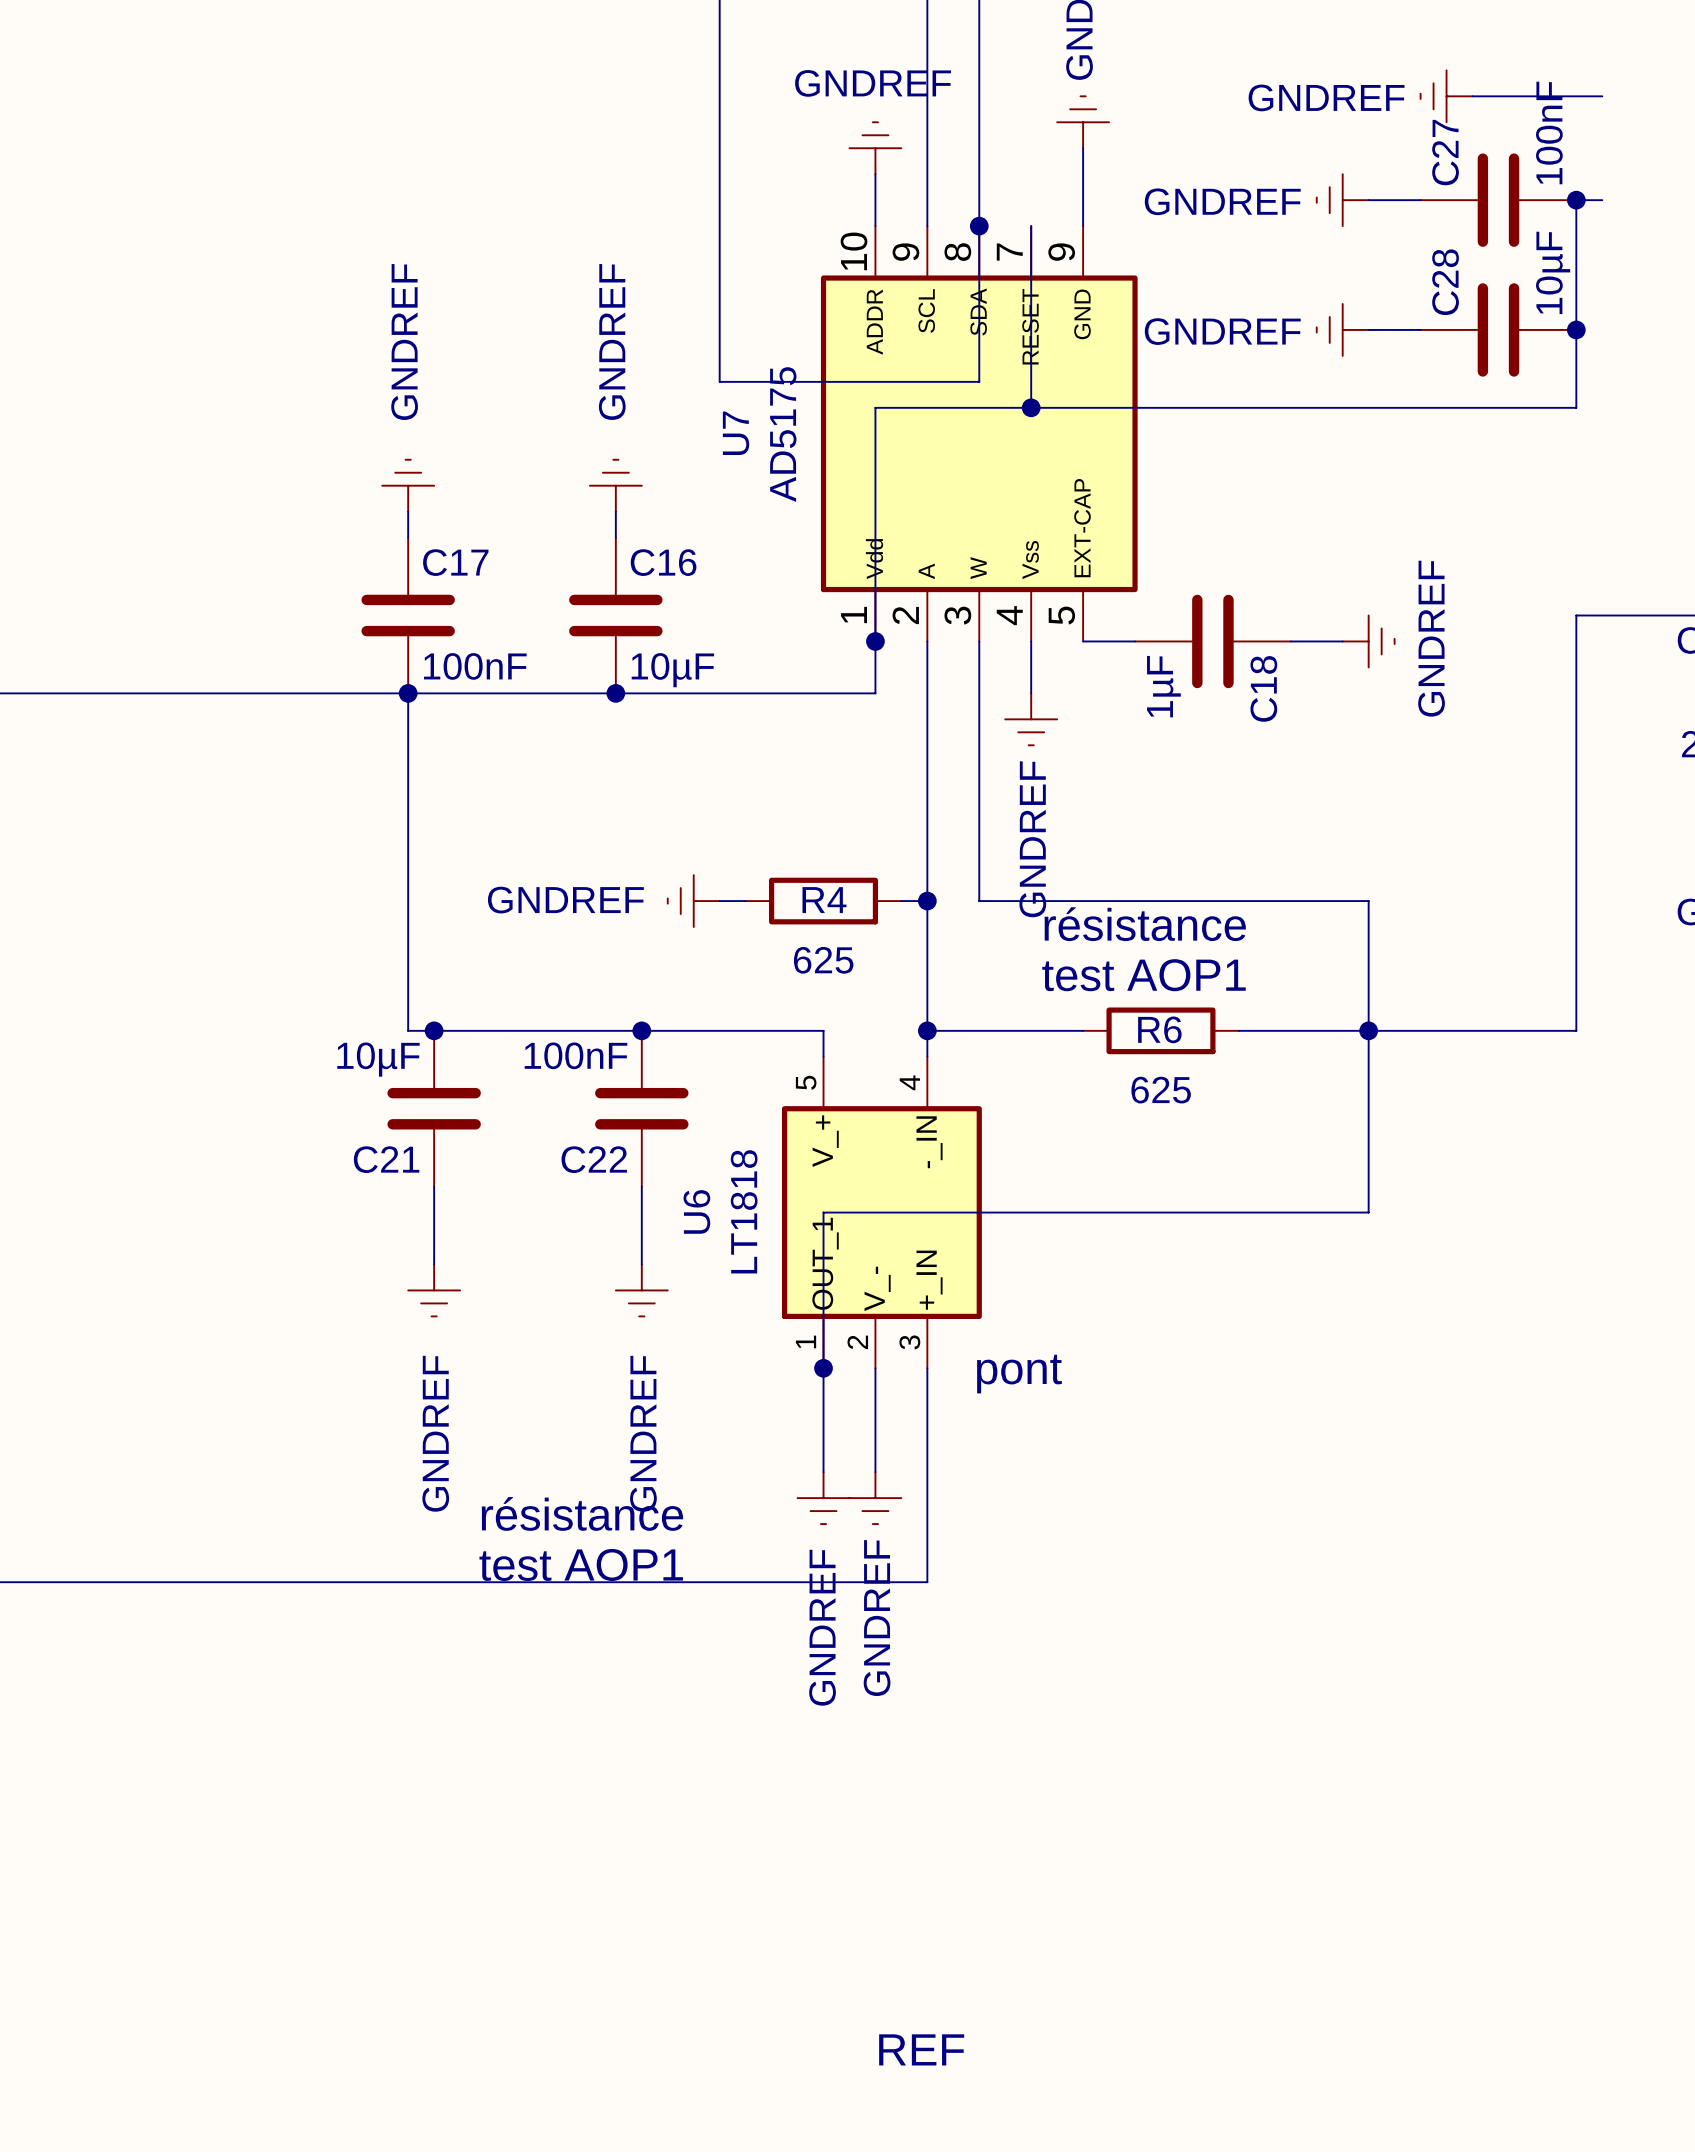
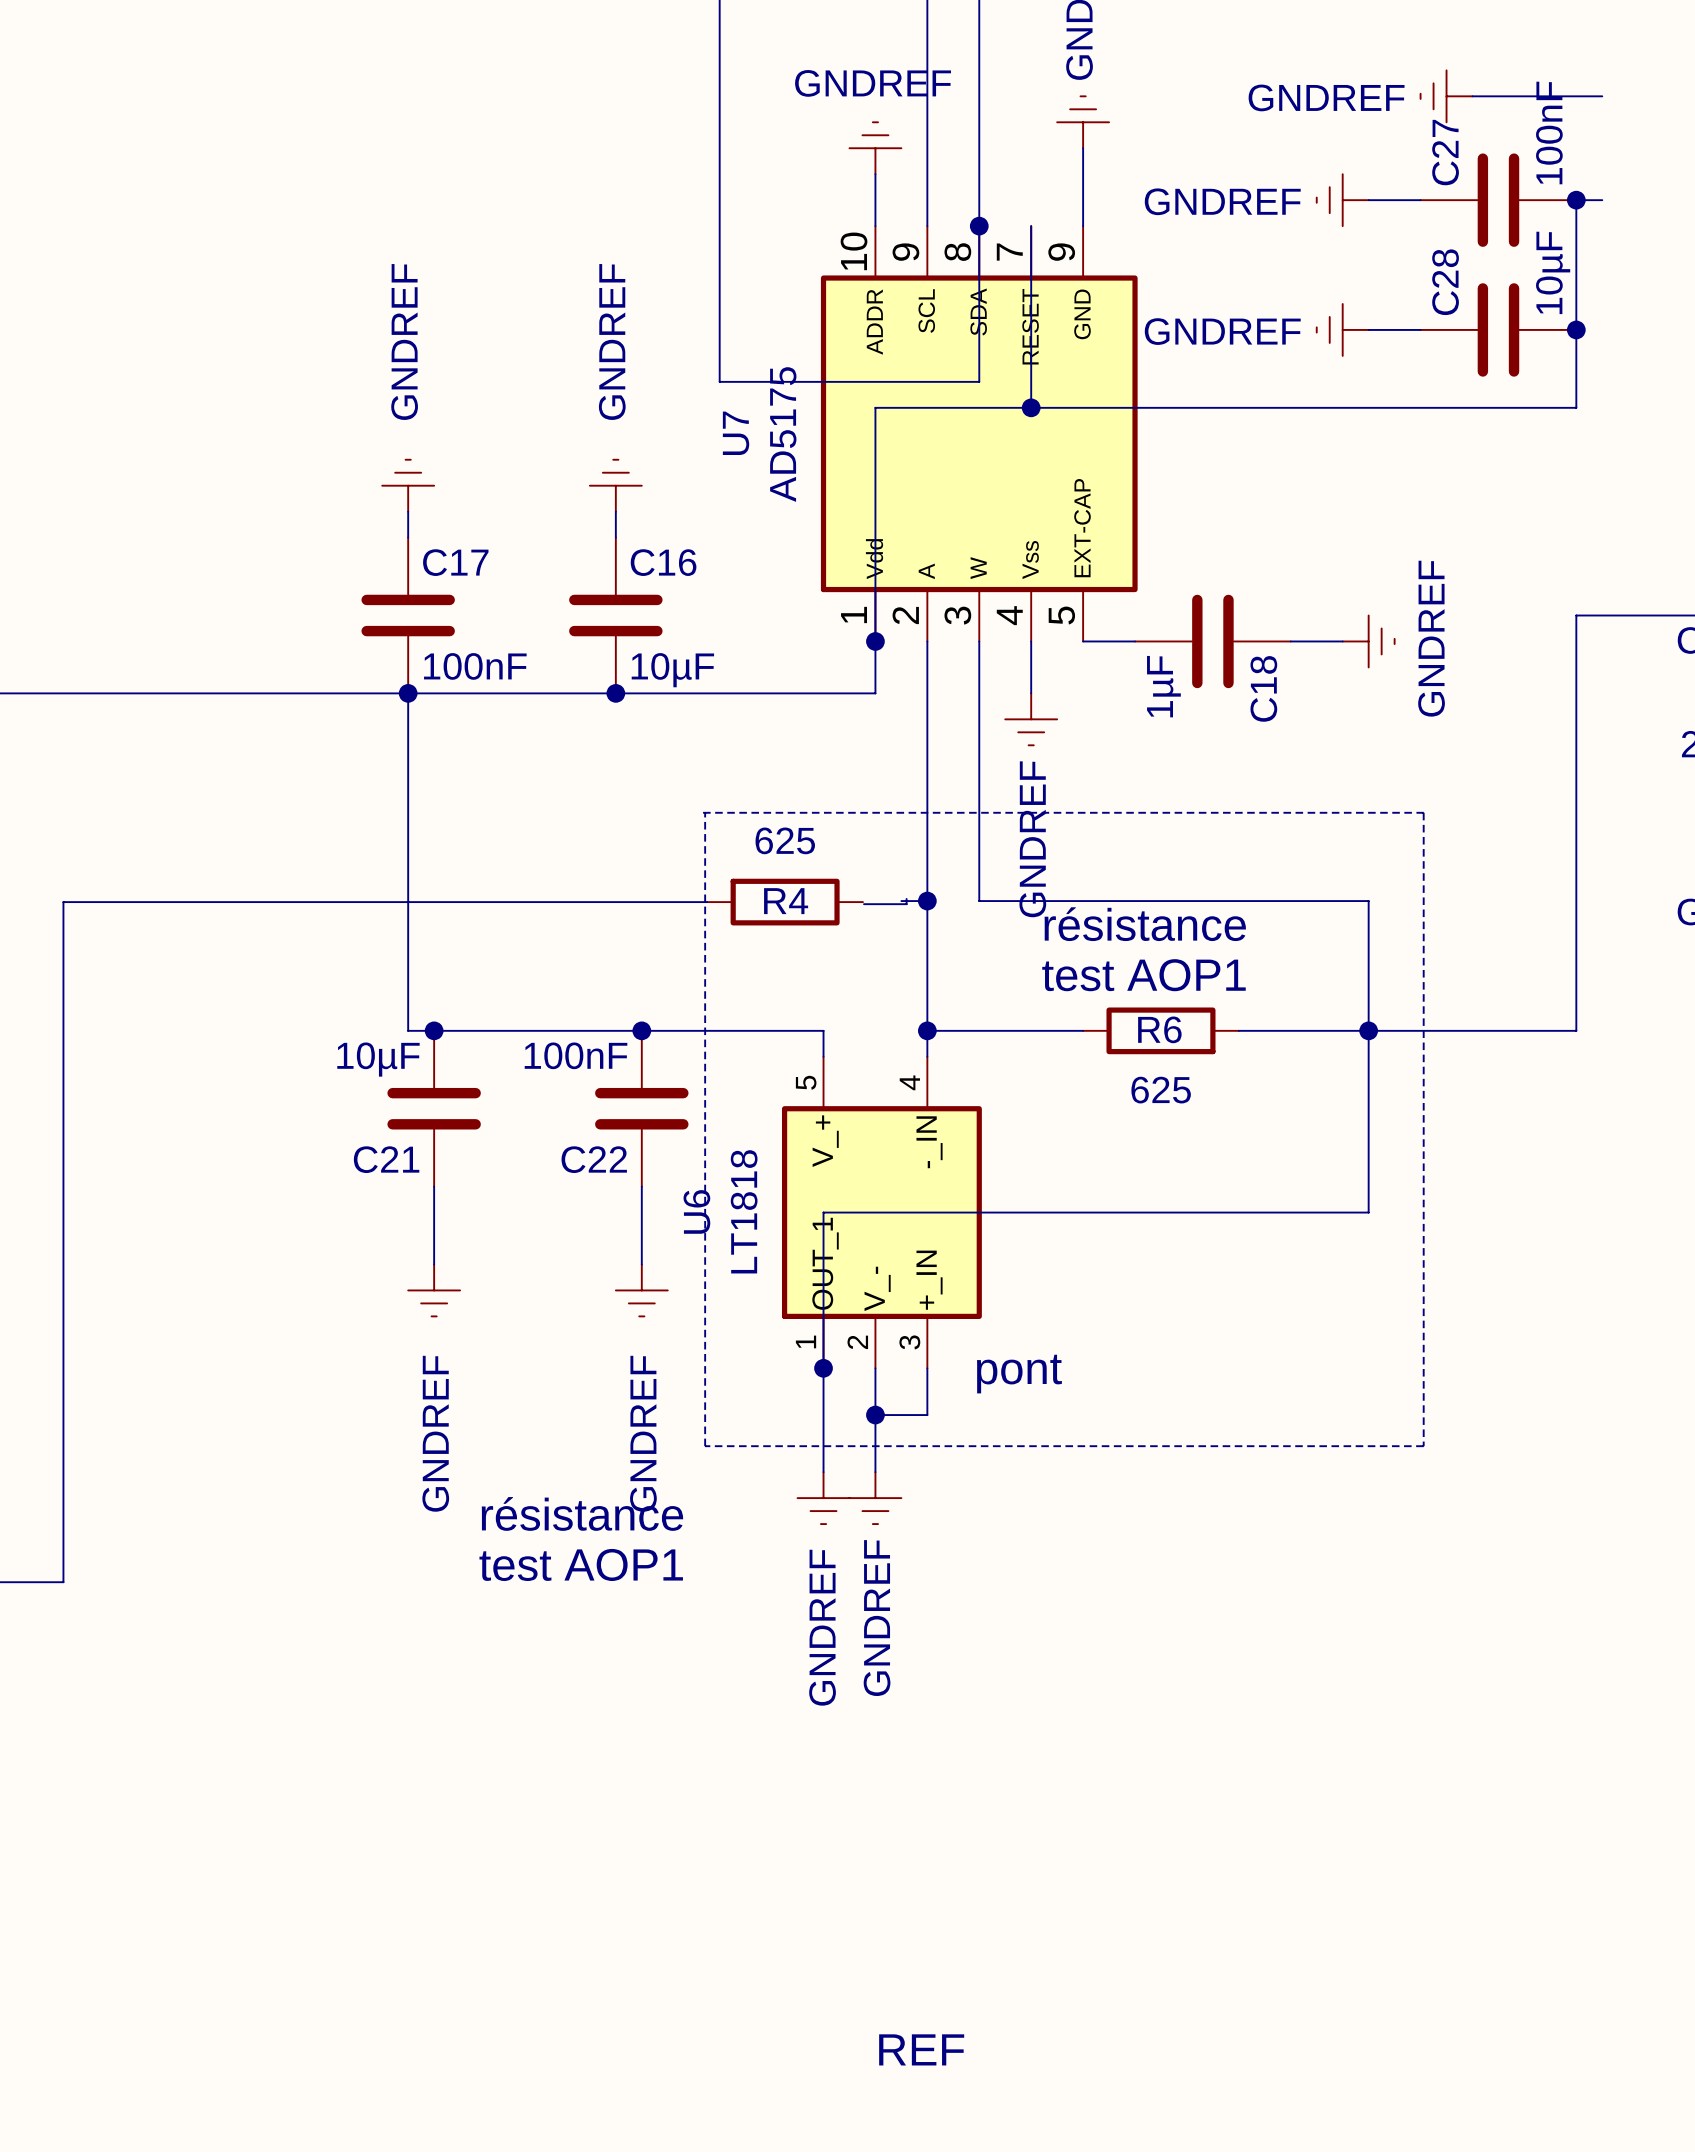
line: none -> (703, 812) (1423, 812) (1423, 1446) (705, 1446) (705, 812)
wire: none -> (906, 898) (906, 904) (864, 904)
power symbol: GNDREF (693, 901) -> none
wire: (719, 901) (745, 901) -> none
R4 position: (823, 901) -> (785, 902)
R4 value position: 625 (823, 960) -> 625 (785, 840)
wire: none -> (875, 1415) (927, 1415)
junction: none -> (875, 1415)
wire: (927, 1415) (927, 1582) (63, 1582) -> (707, 902) (63, 902) (63, 1582)

